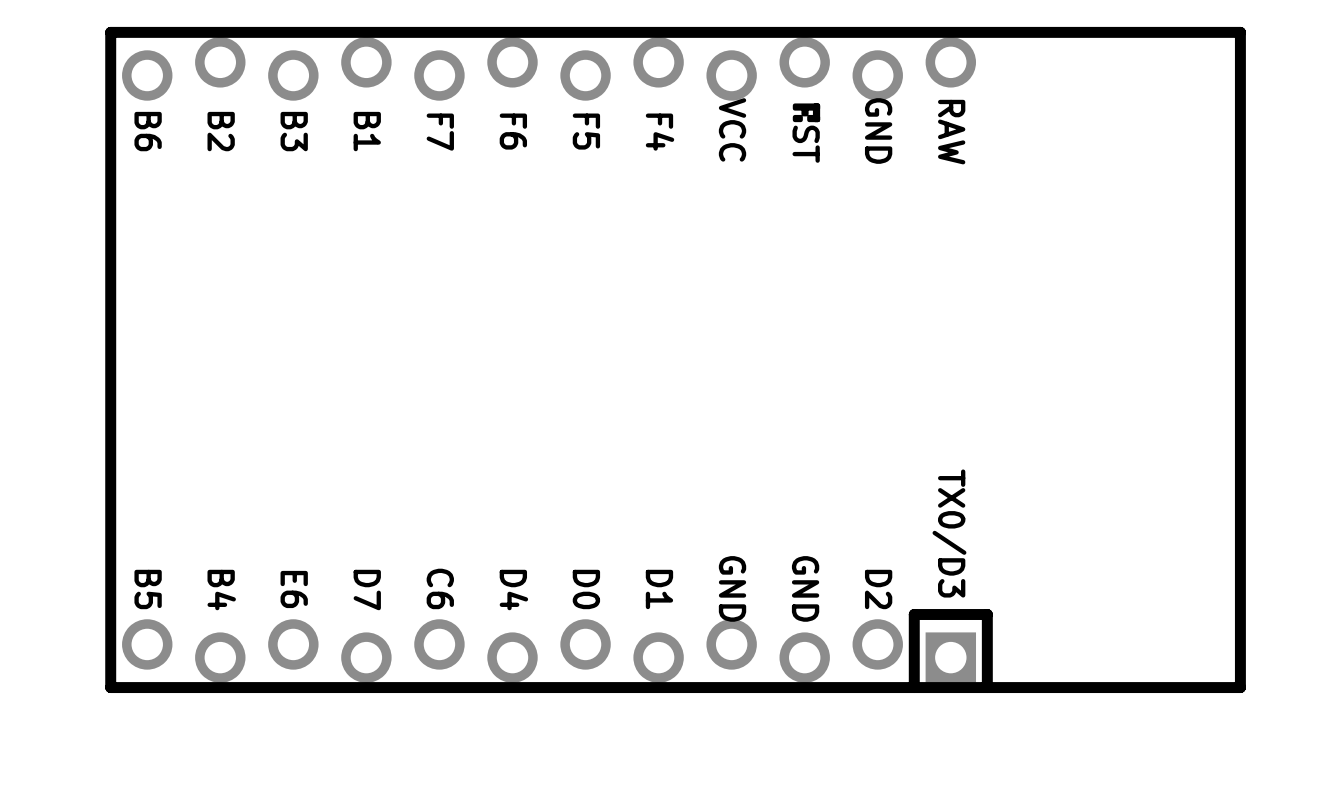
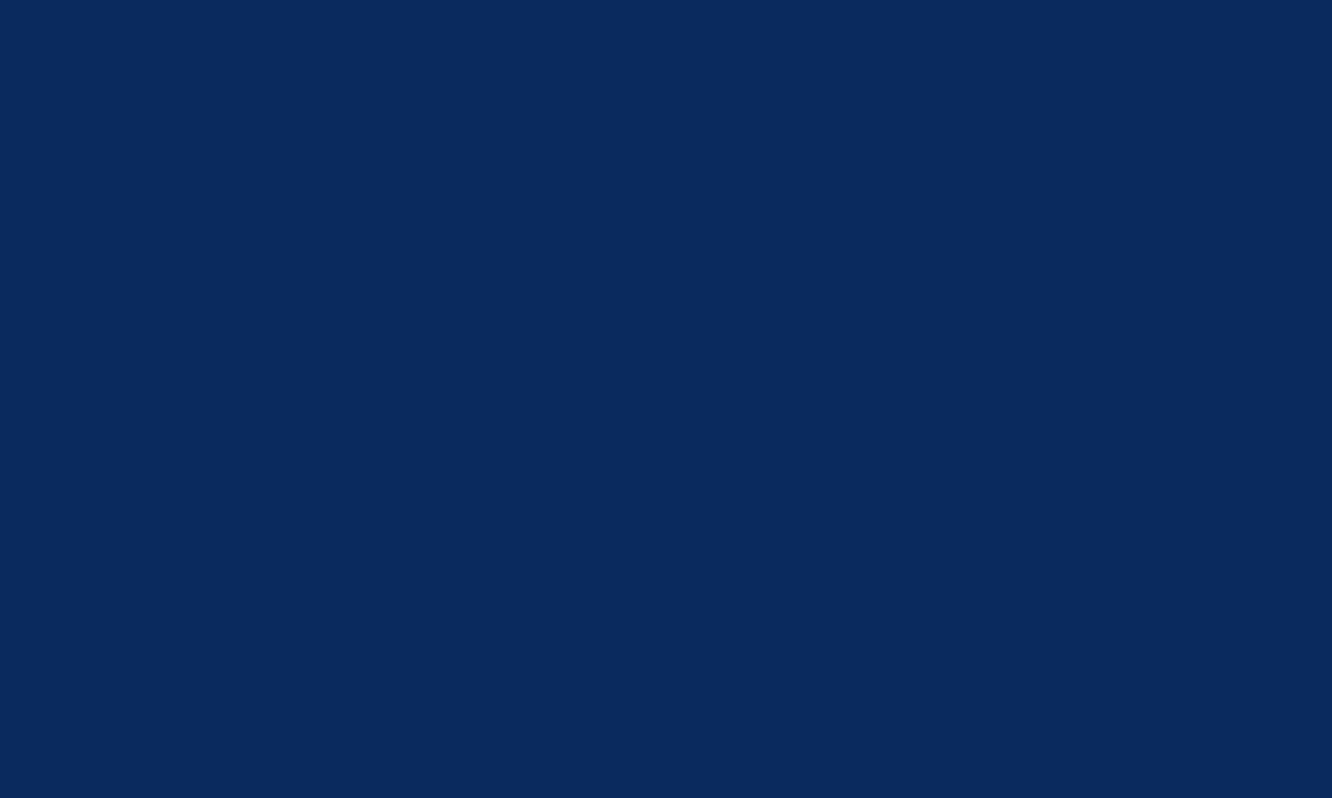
part: (675, 359) -> none

